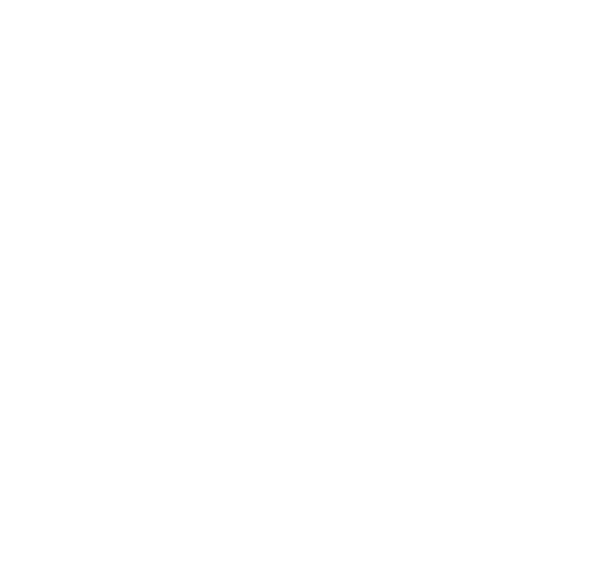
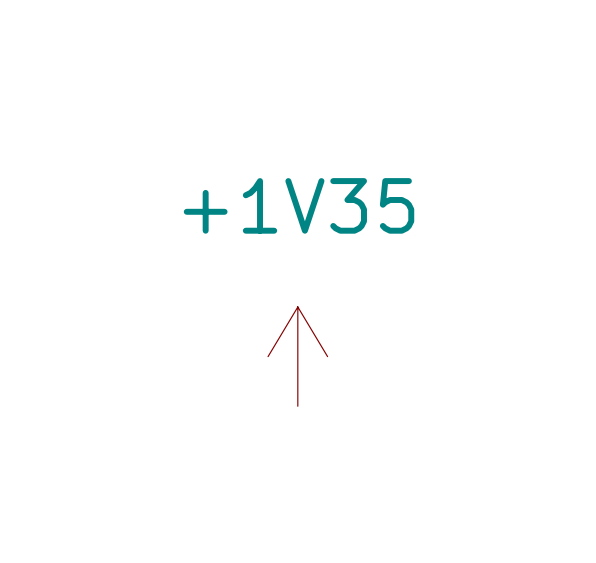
power symbol: none -> +1V35 (297, 356)

